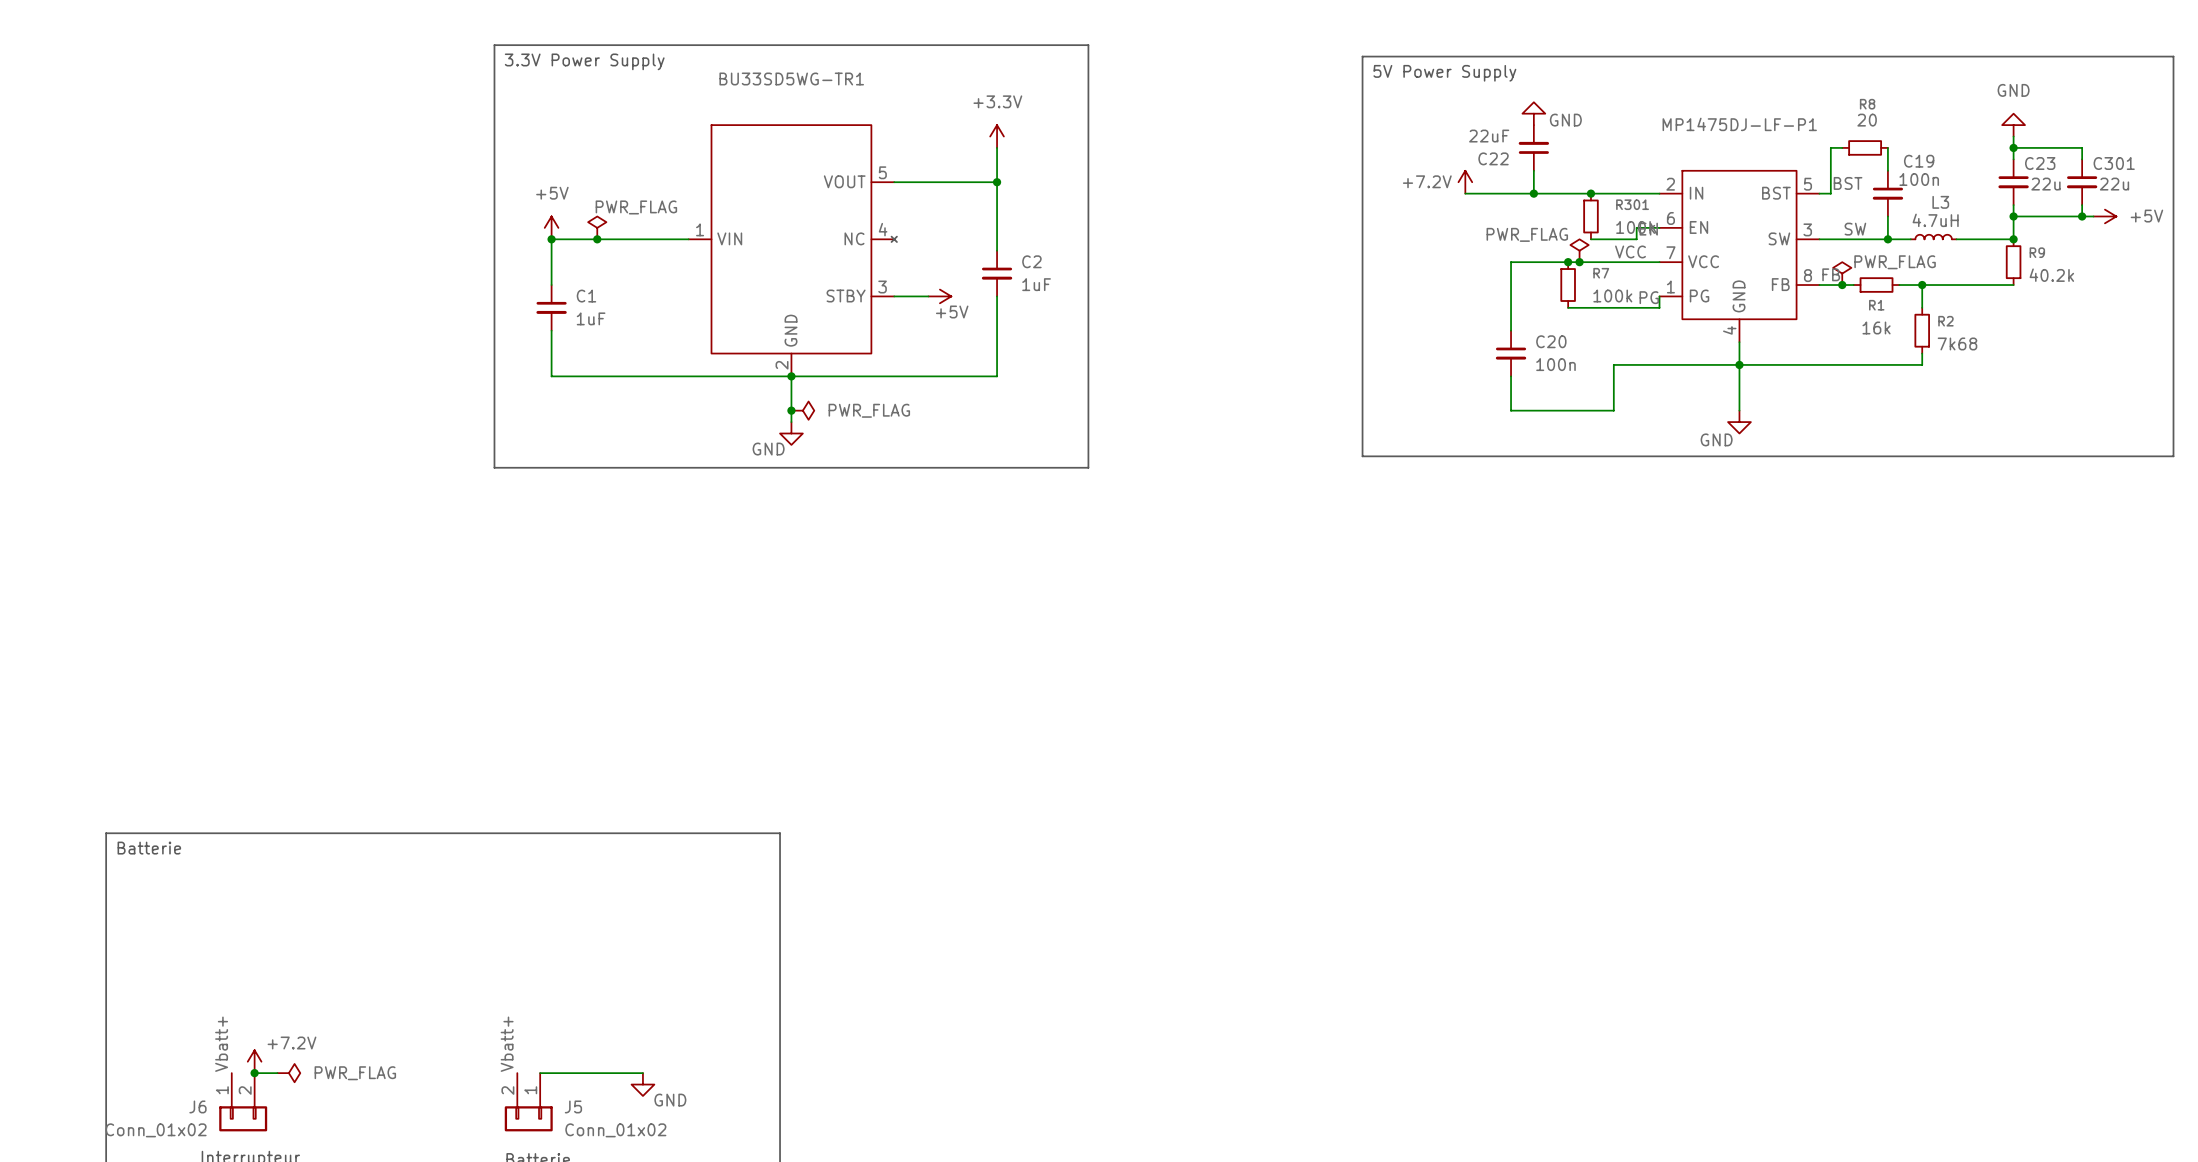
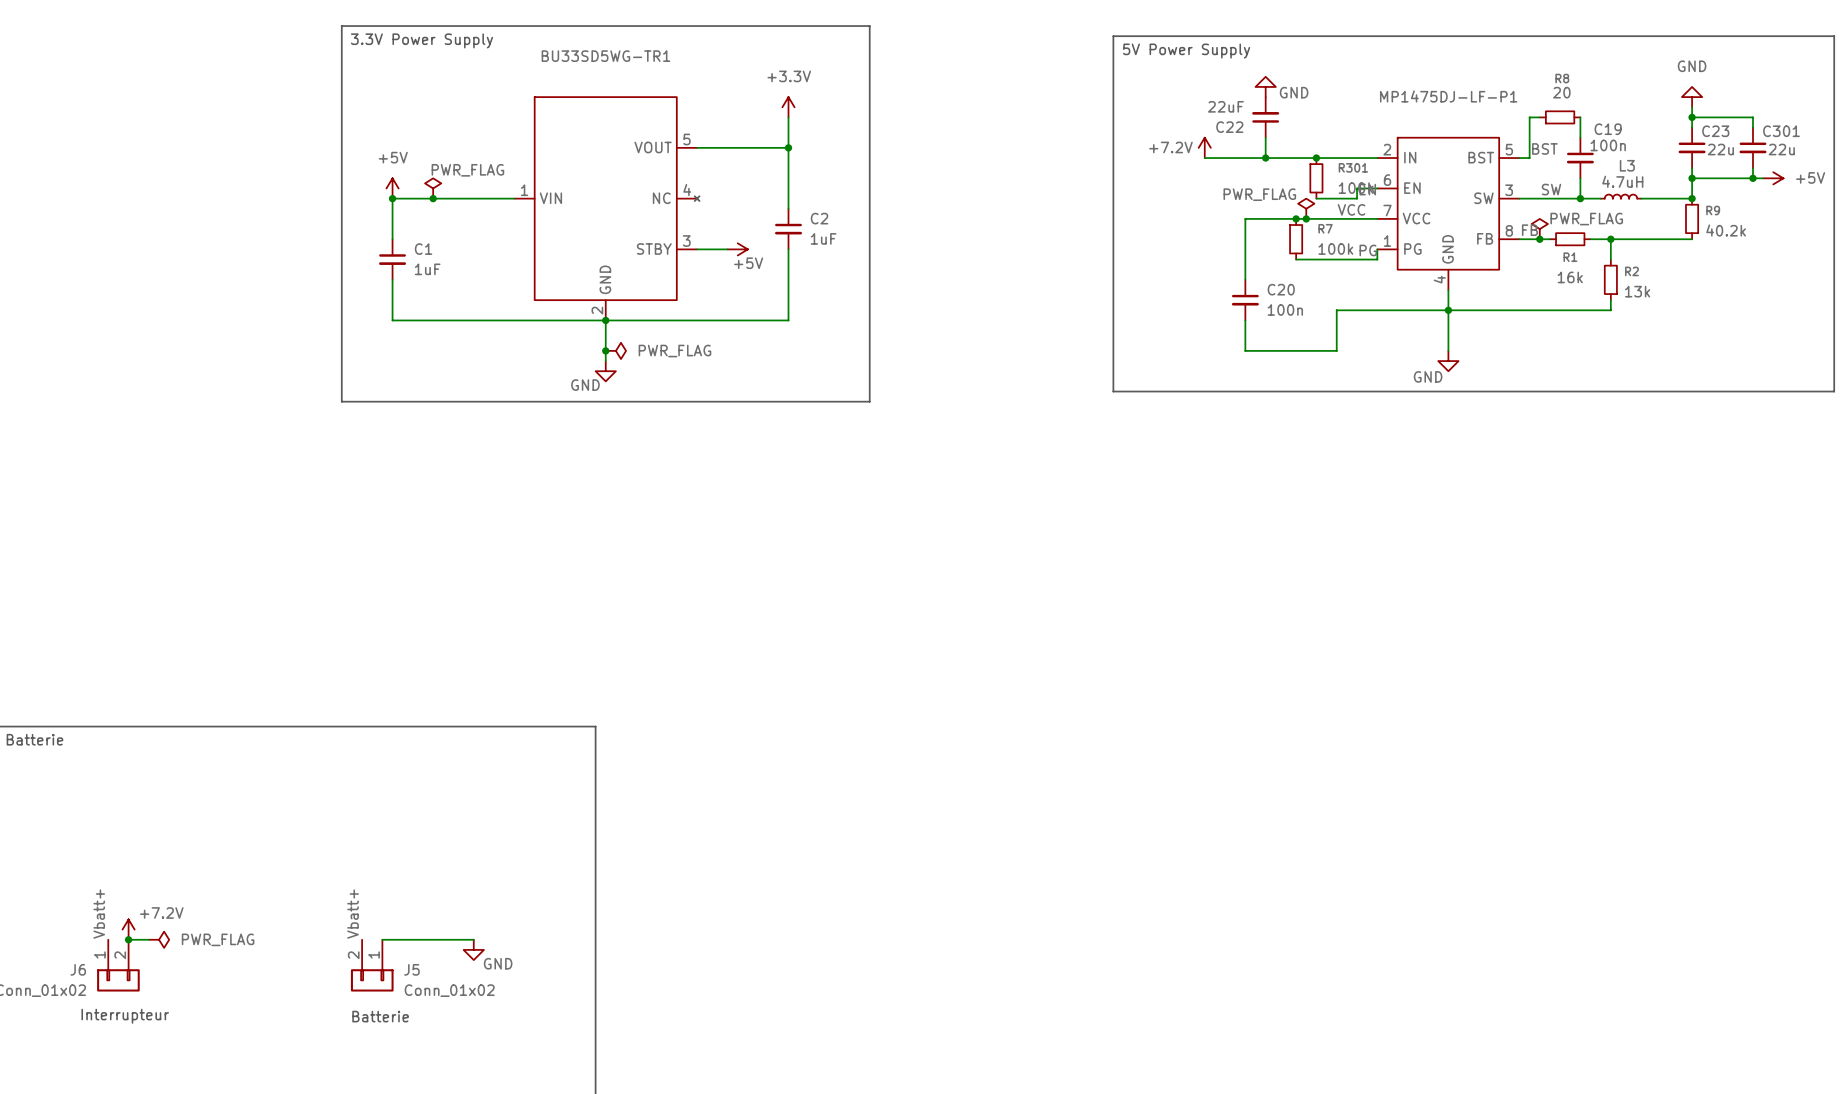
R2 value: 7k68 (1957, 343) -> 13k (1637, 291)

